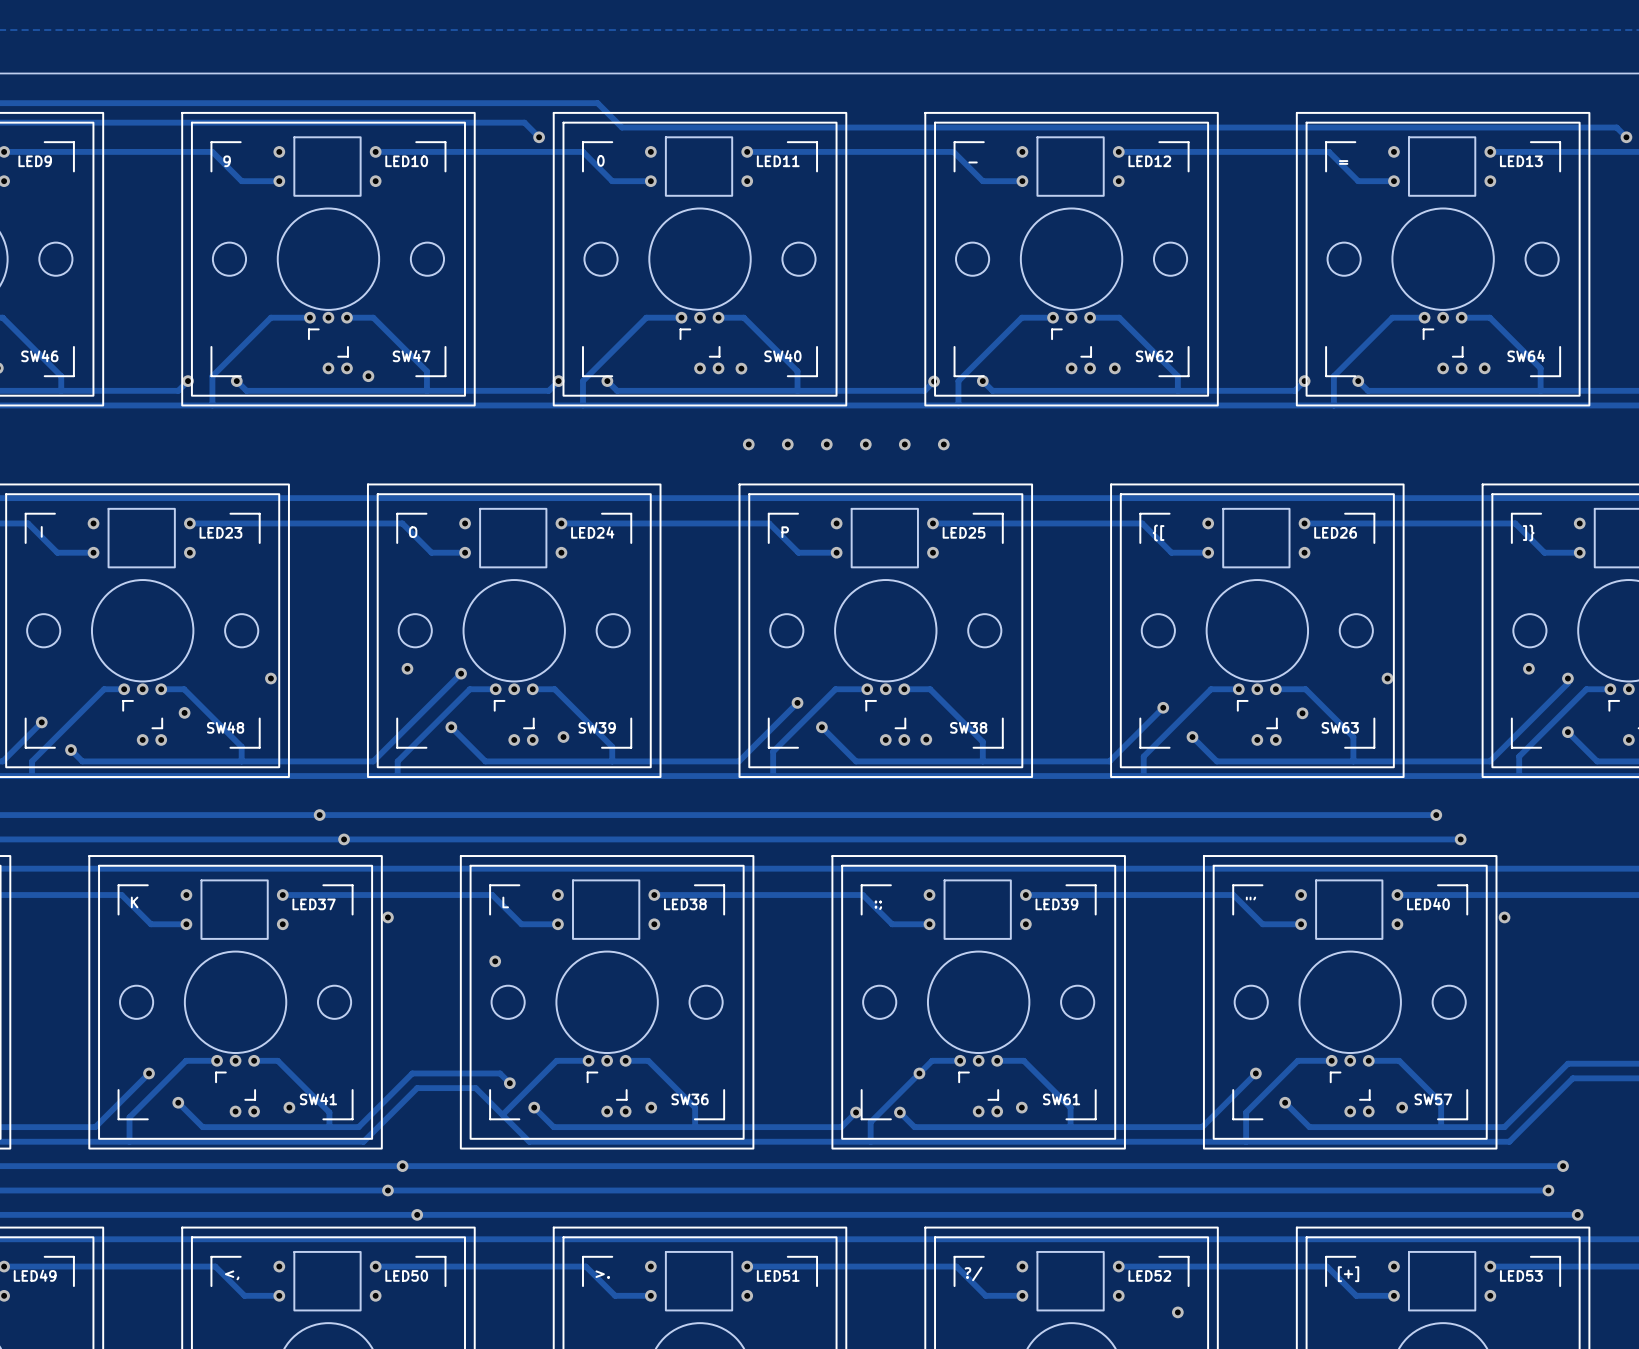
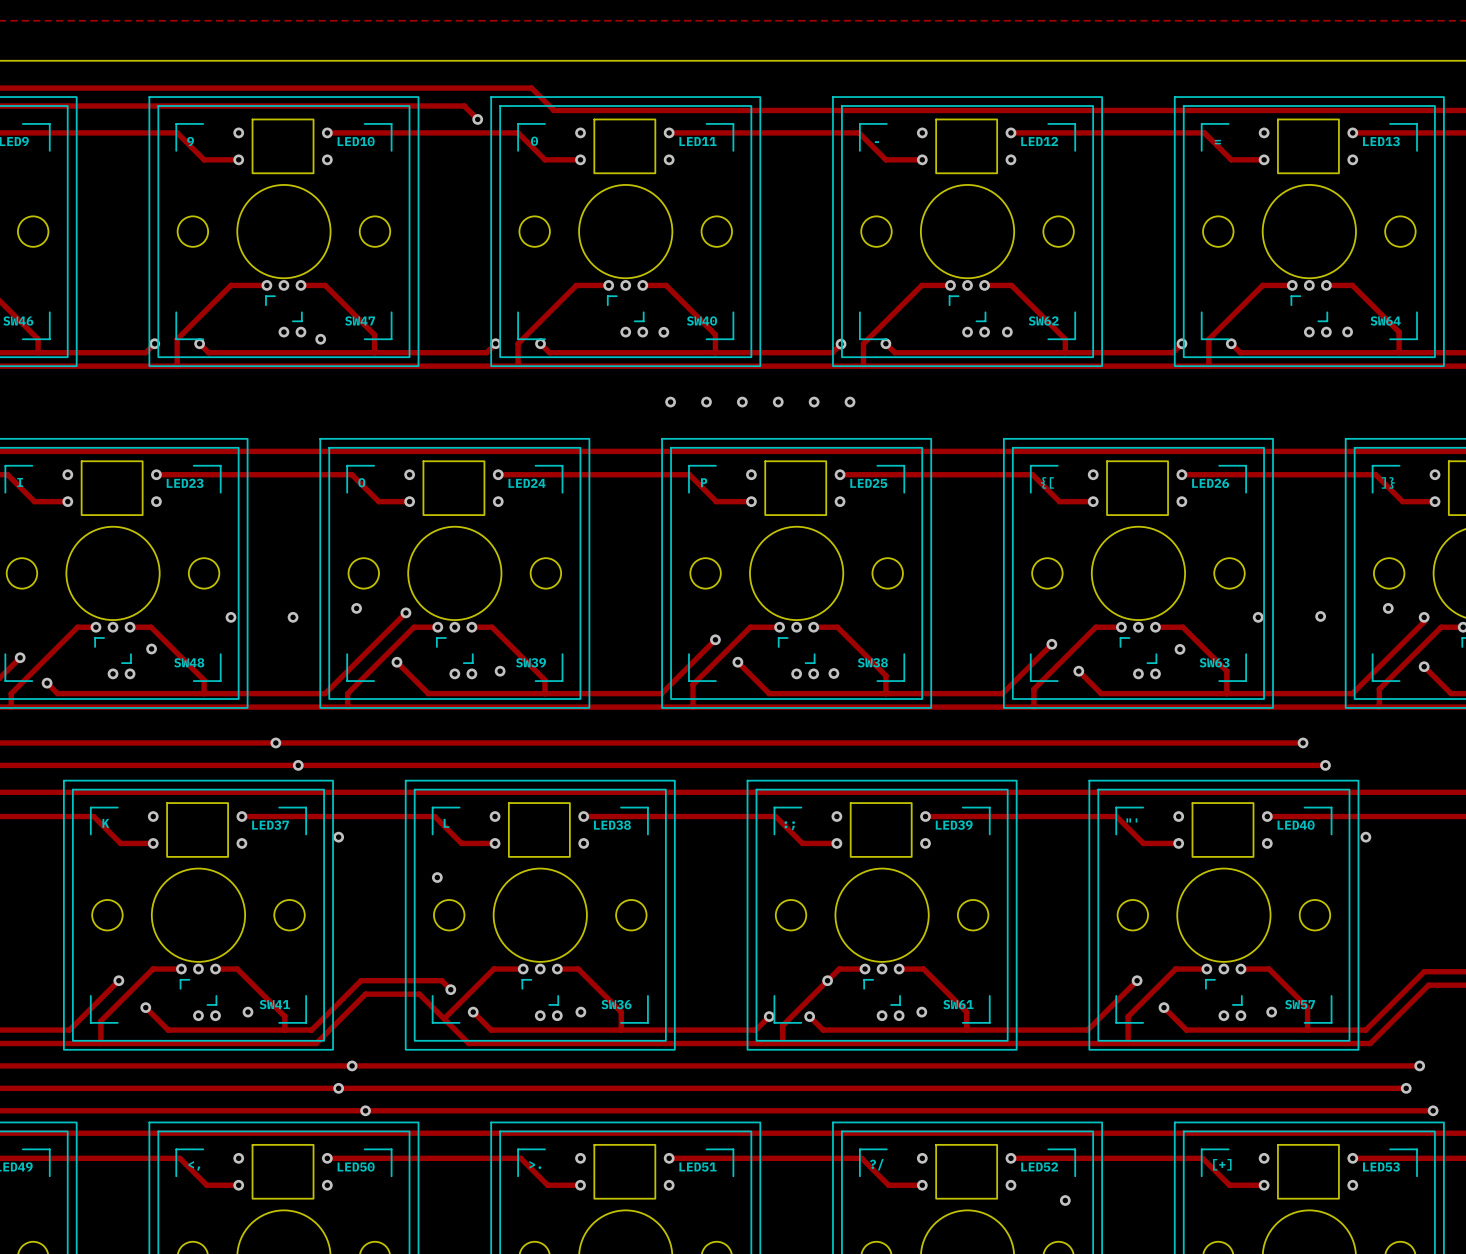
via: none -> (1320, 616)
via: none -> (293, 617)

